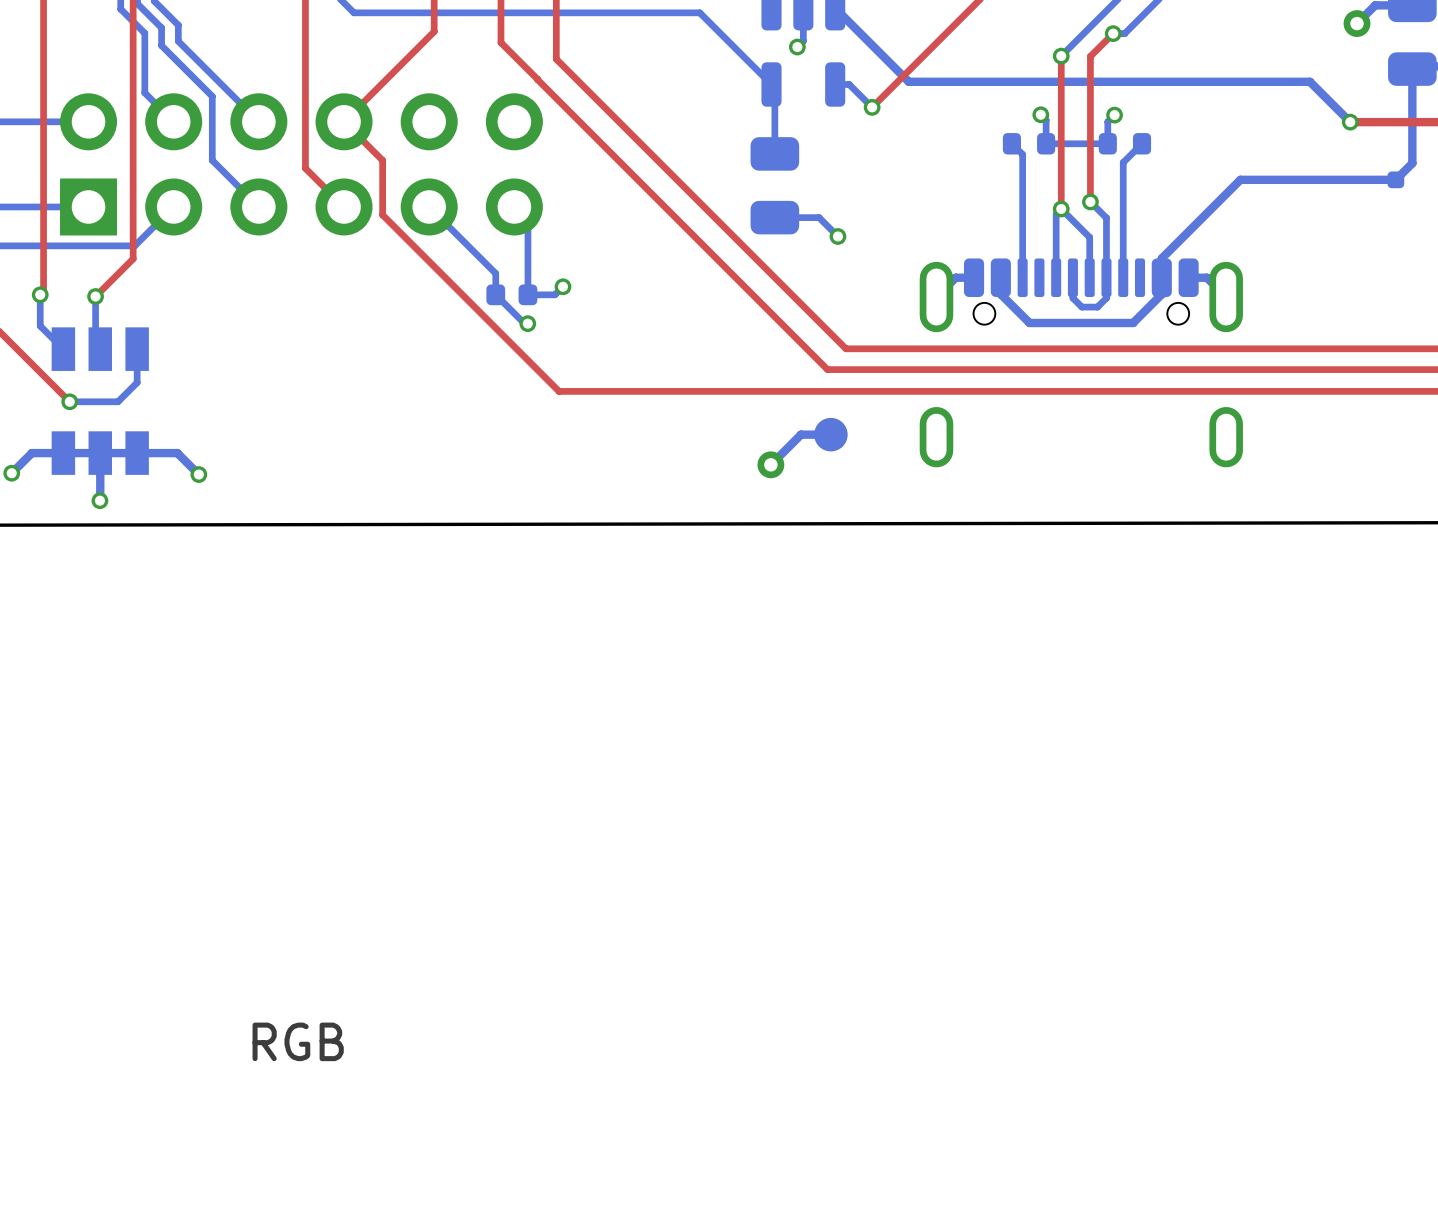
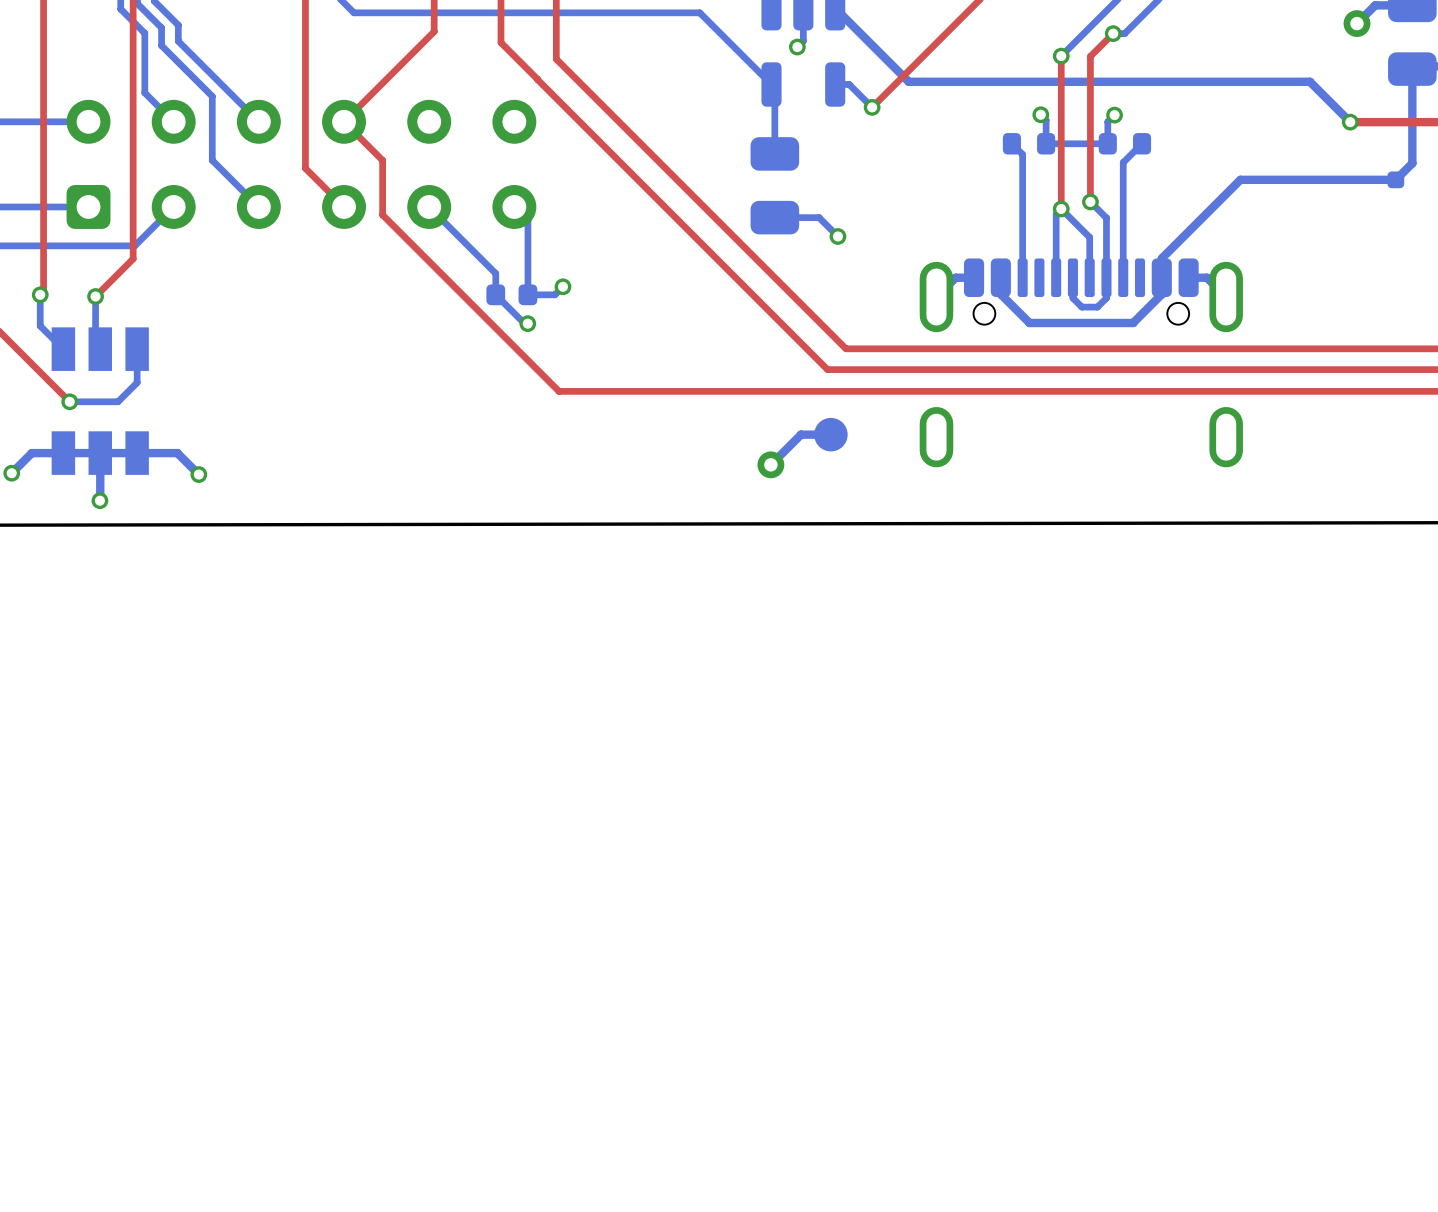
part footprint: [60, 93, 543, 236] -> [66, 99, 537, 229]
text: RGB (298, 1041) -> none

